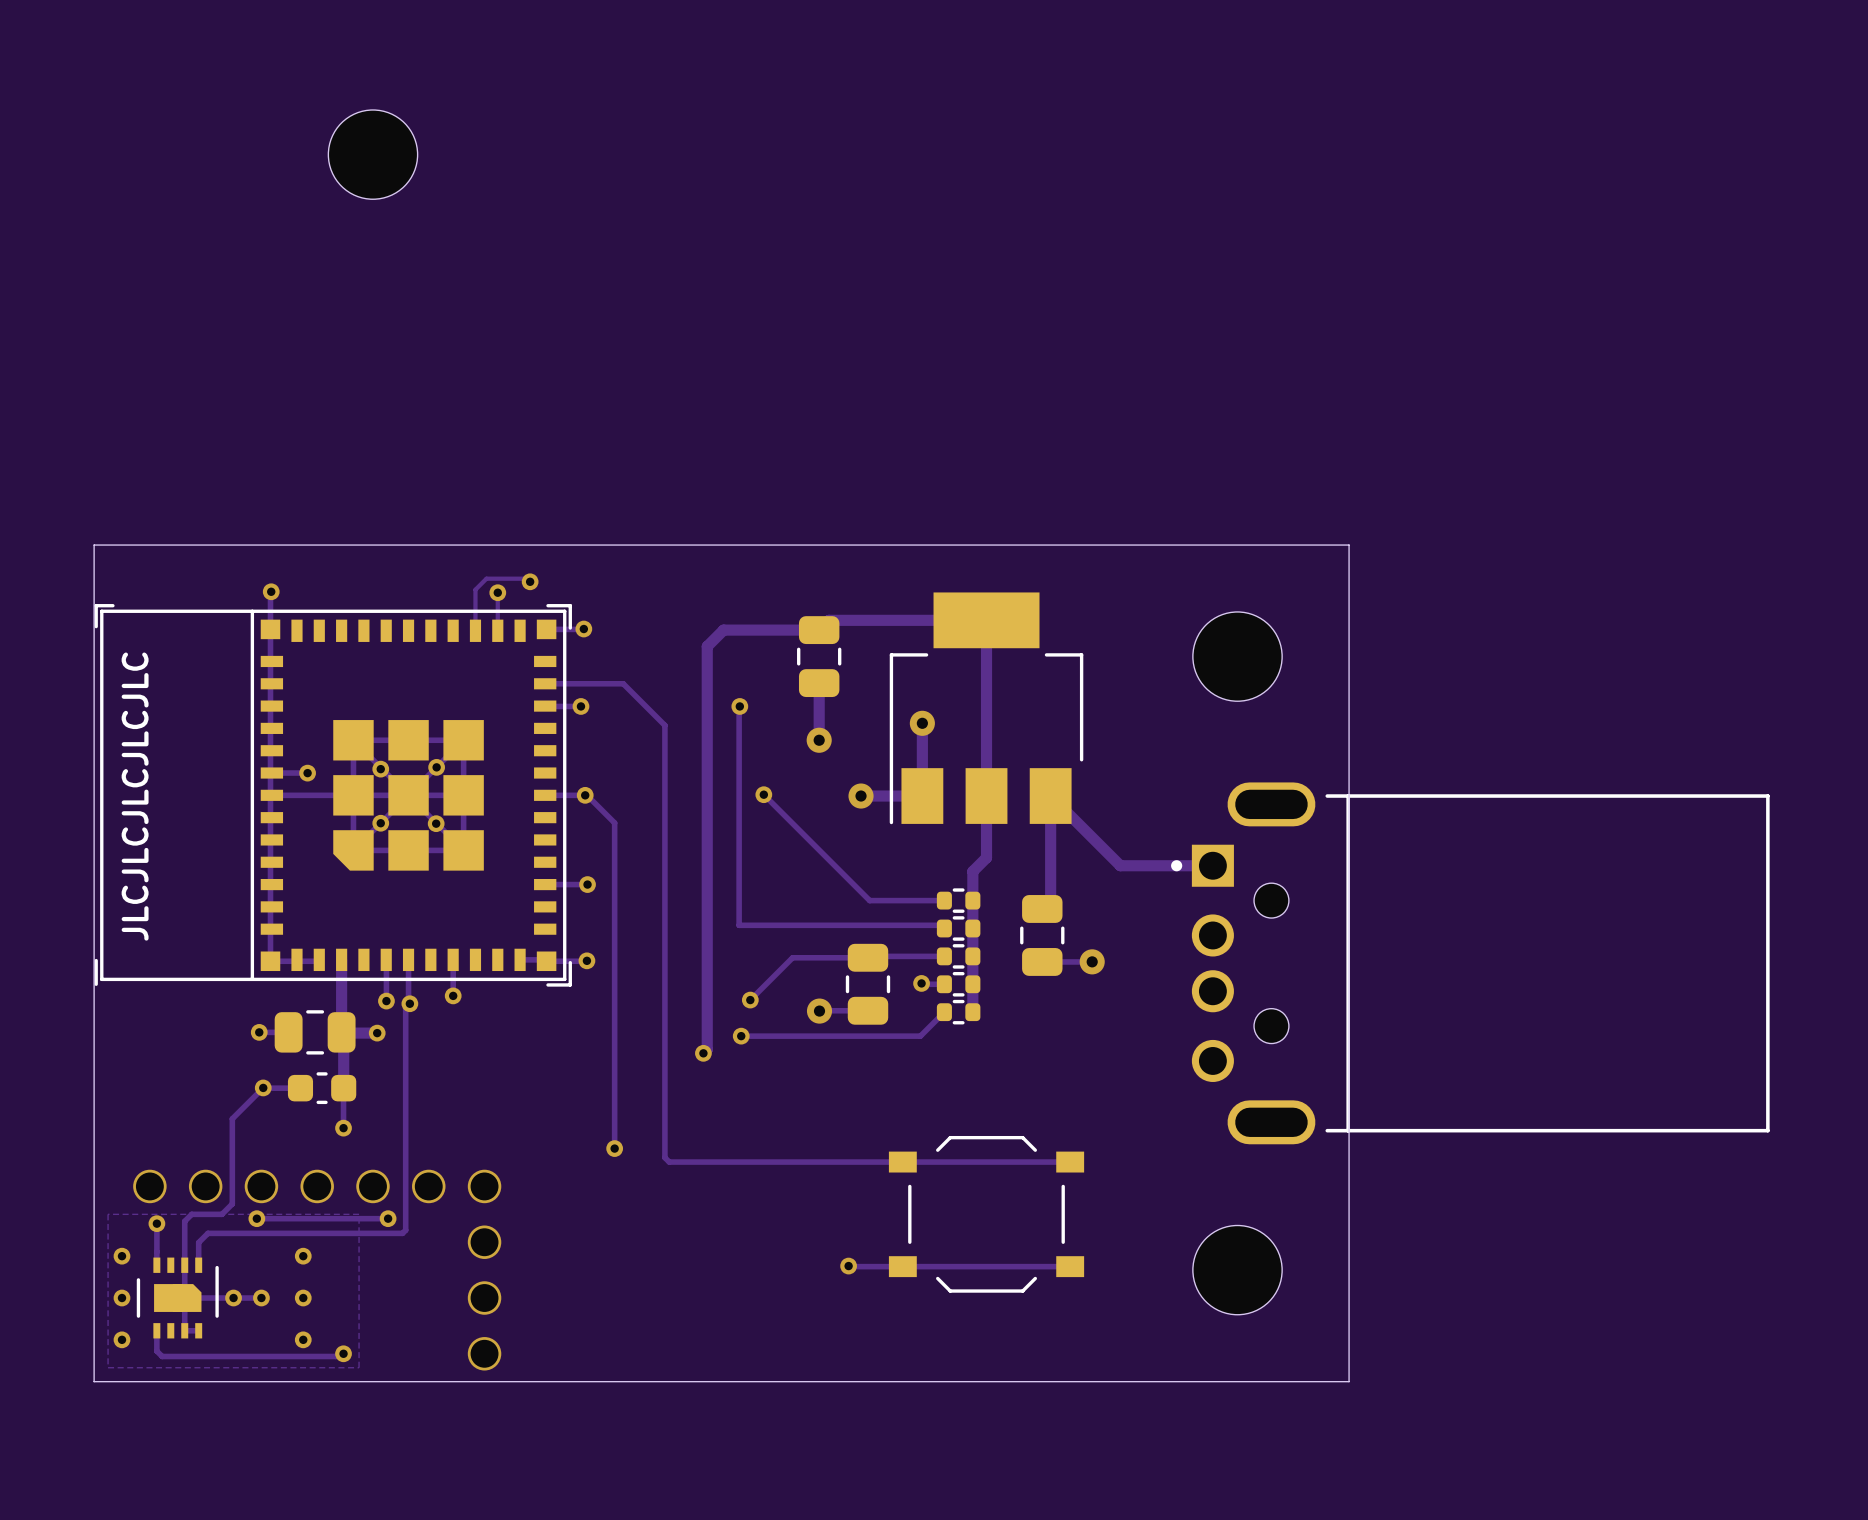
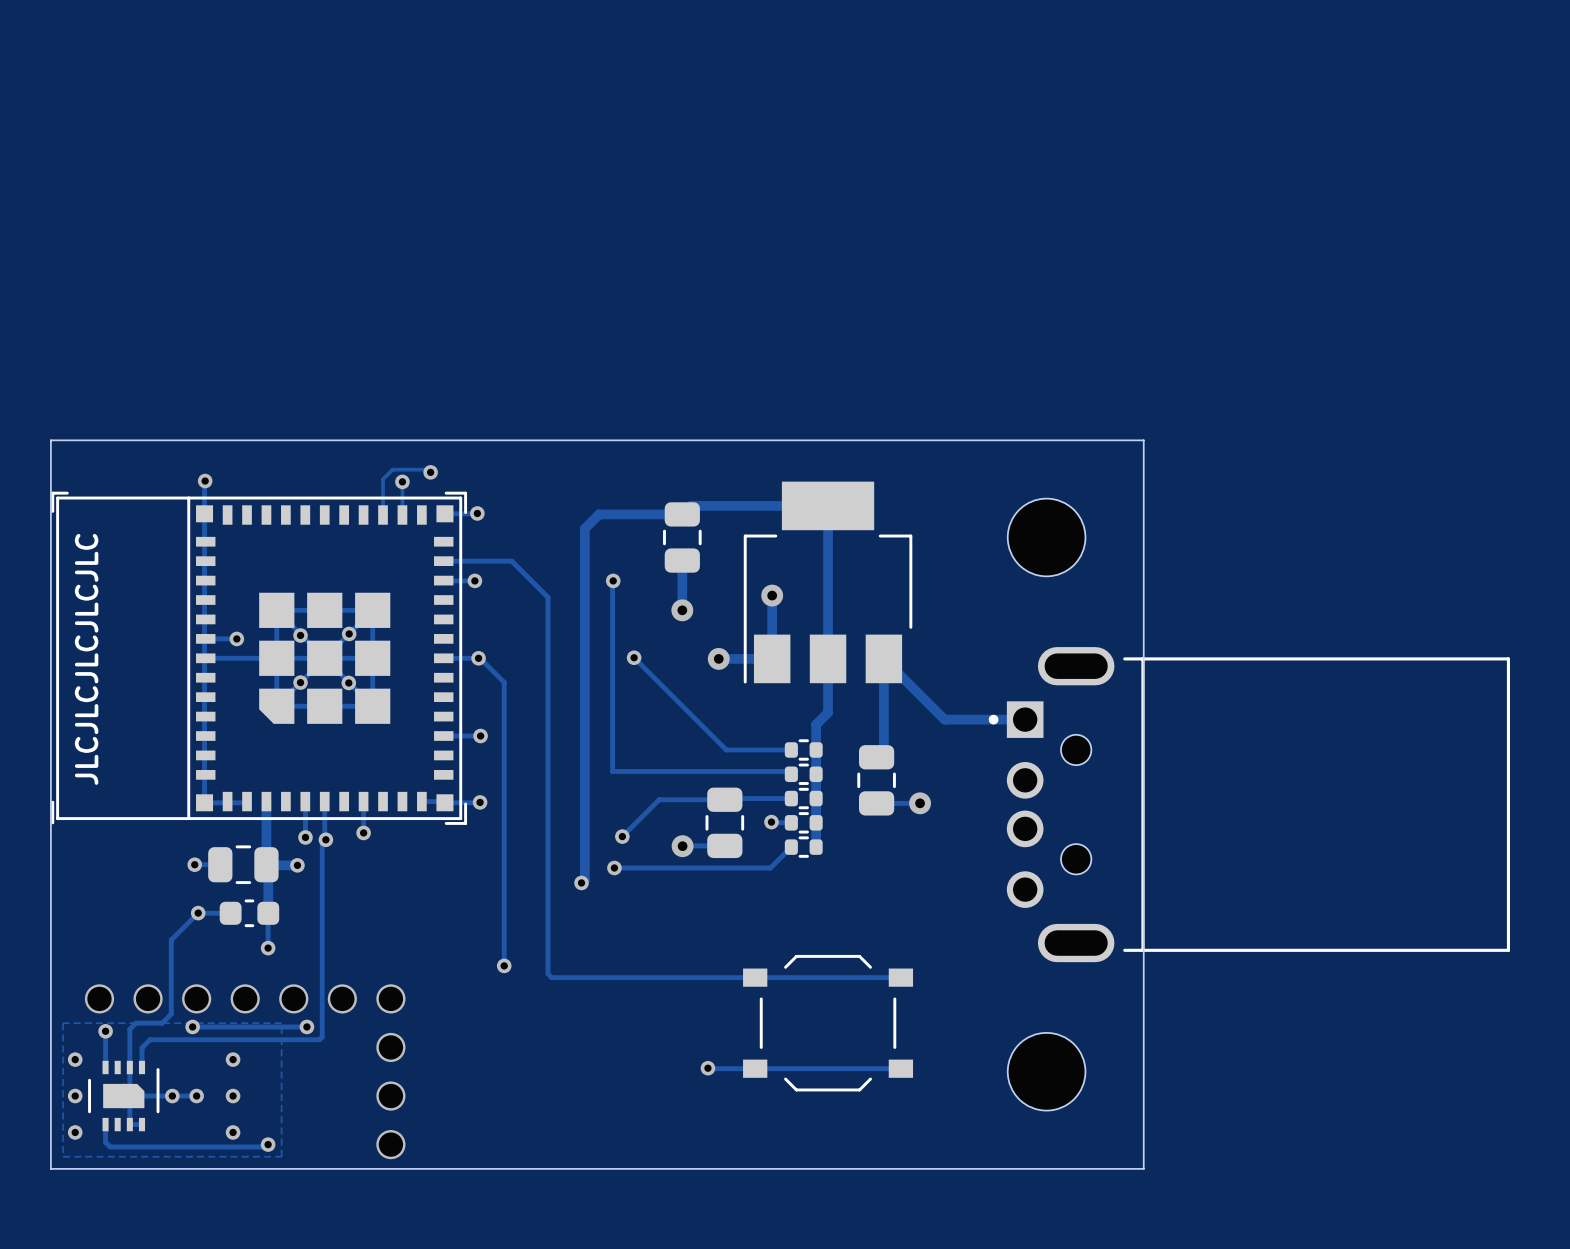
part: (372, 154) -> none

